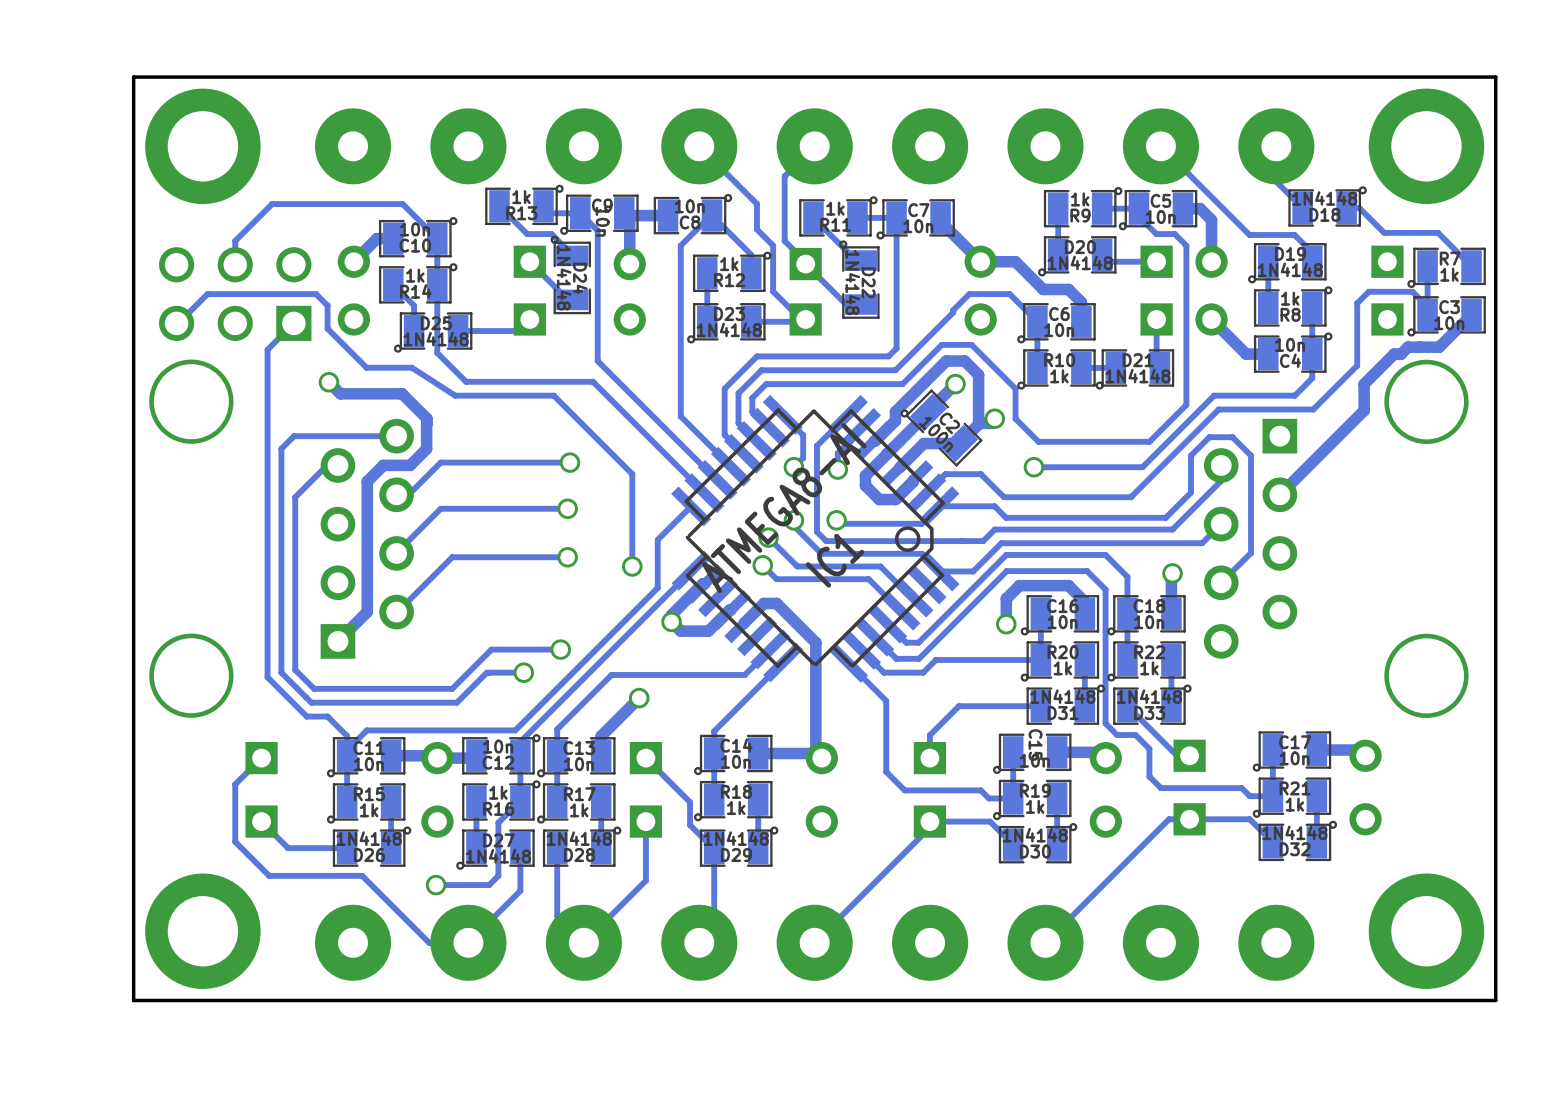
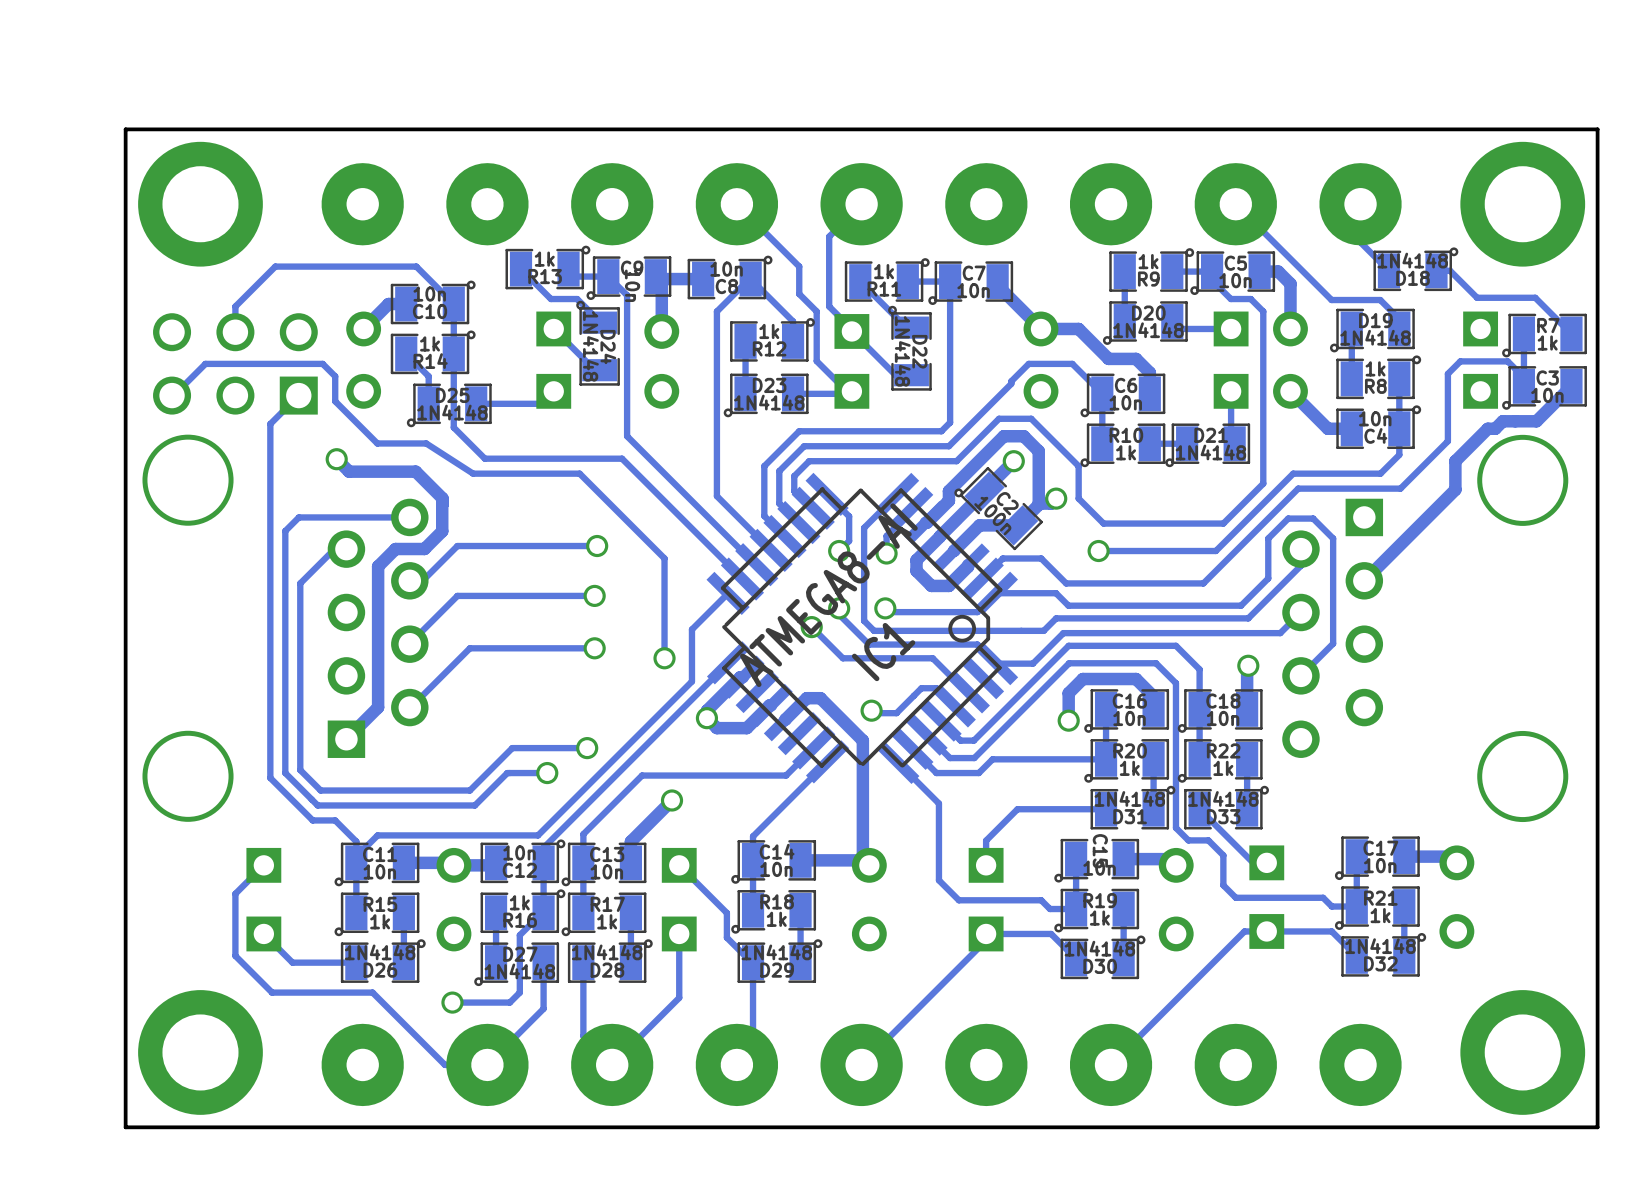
track: (762, 565) (776, 579) (868, 579) (884, 594) -> (871, 710) (874, 713) (896, 713) (921, 688) (936, 688)
via position: (762, 565) -> (871, 710)

